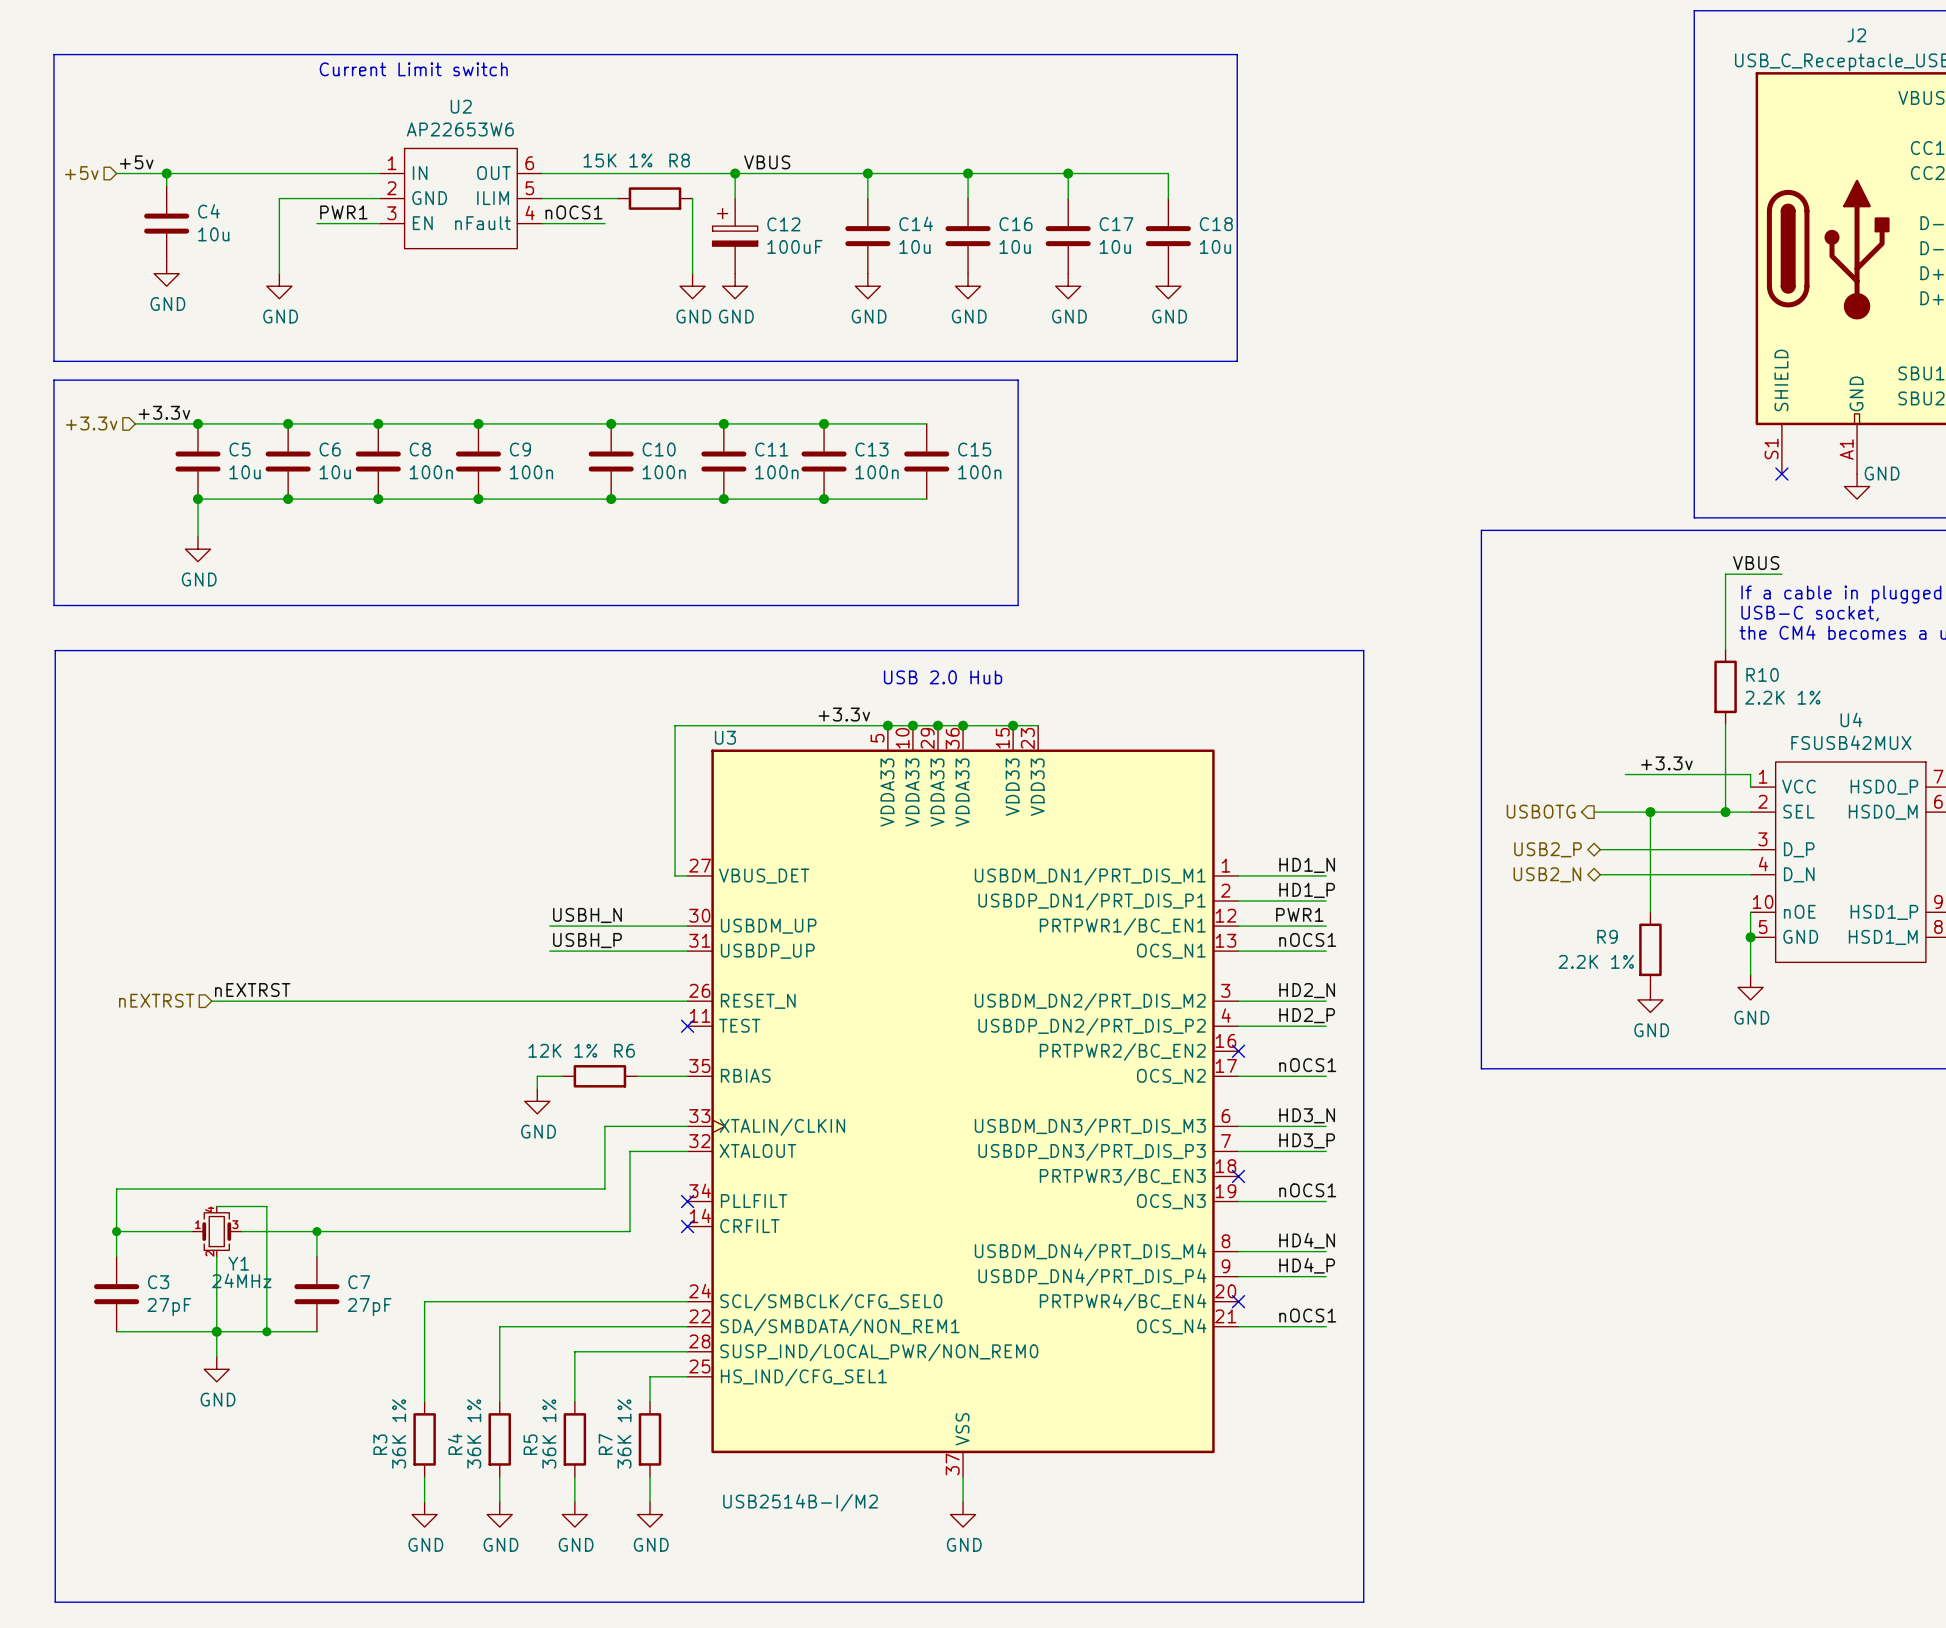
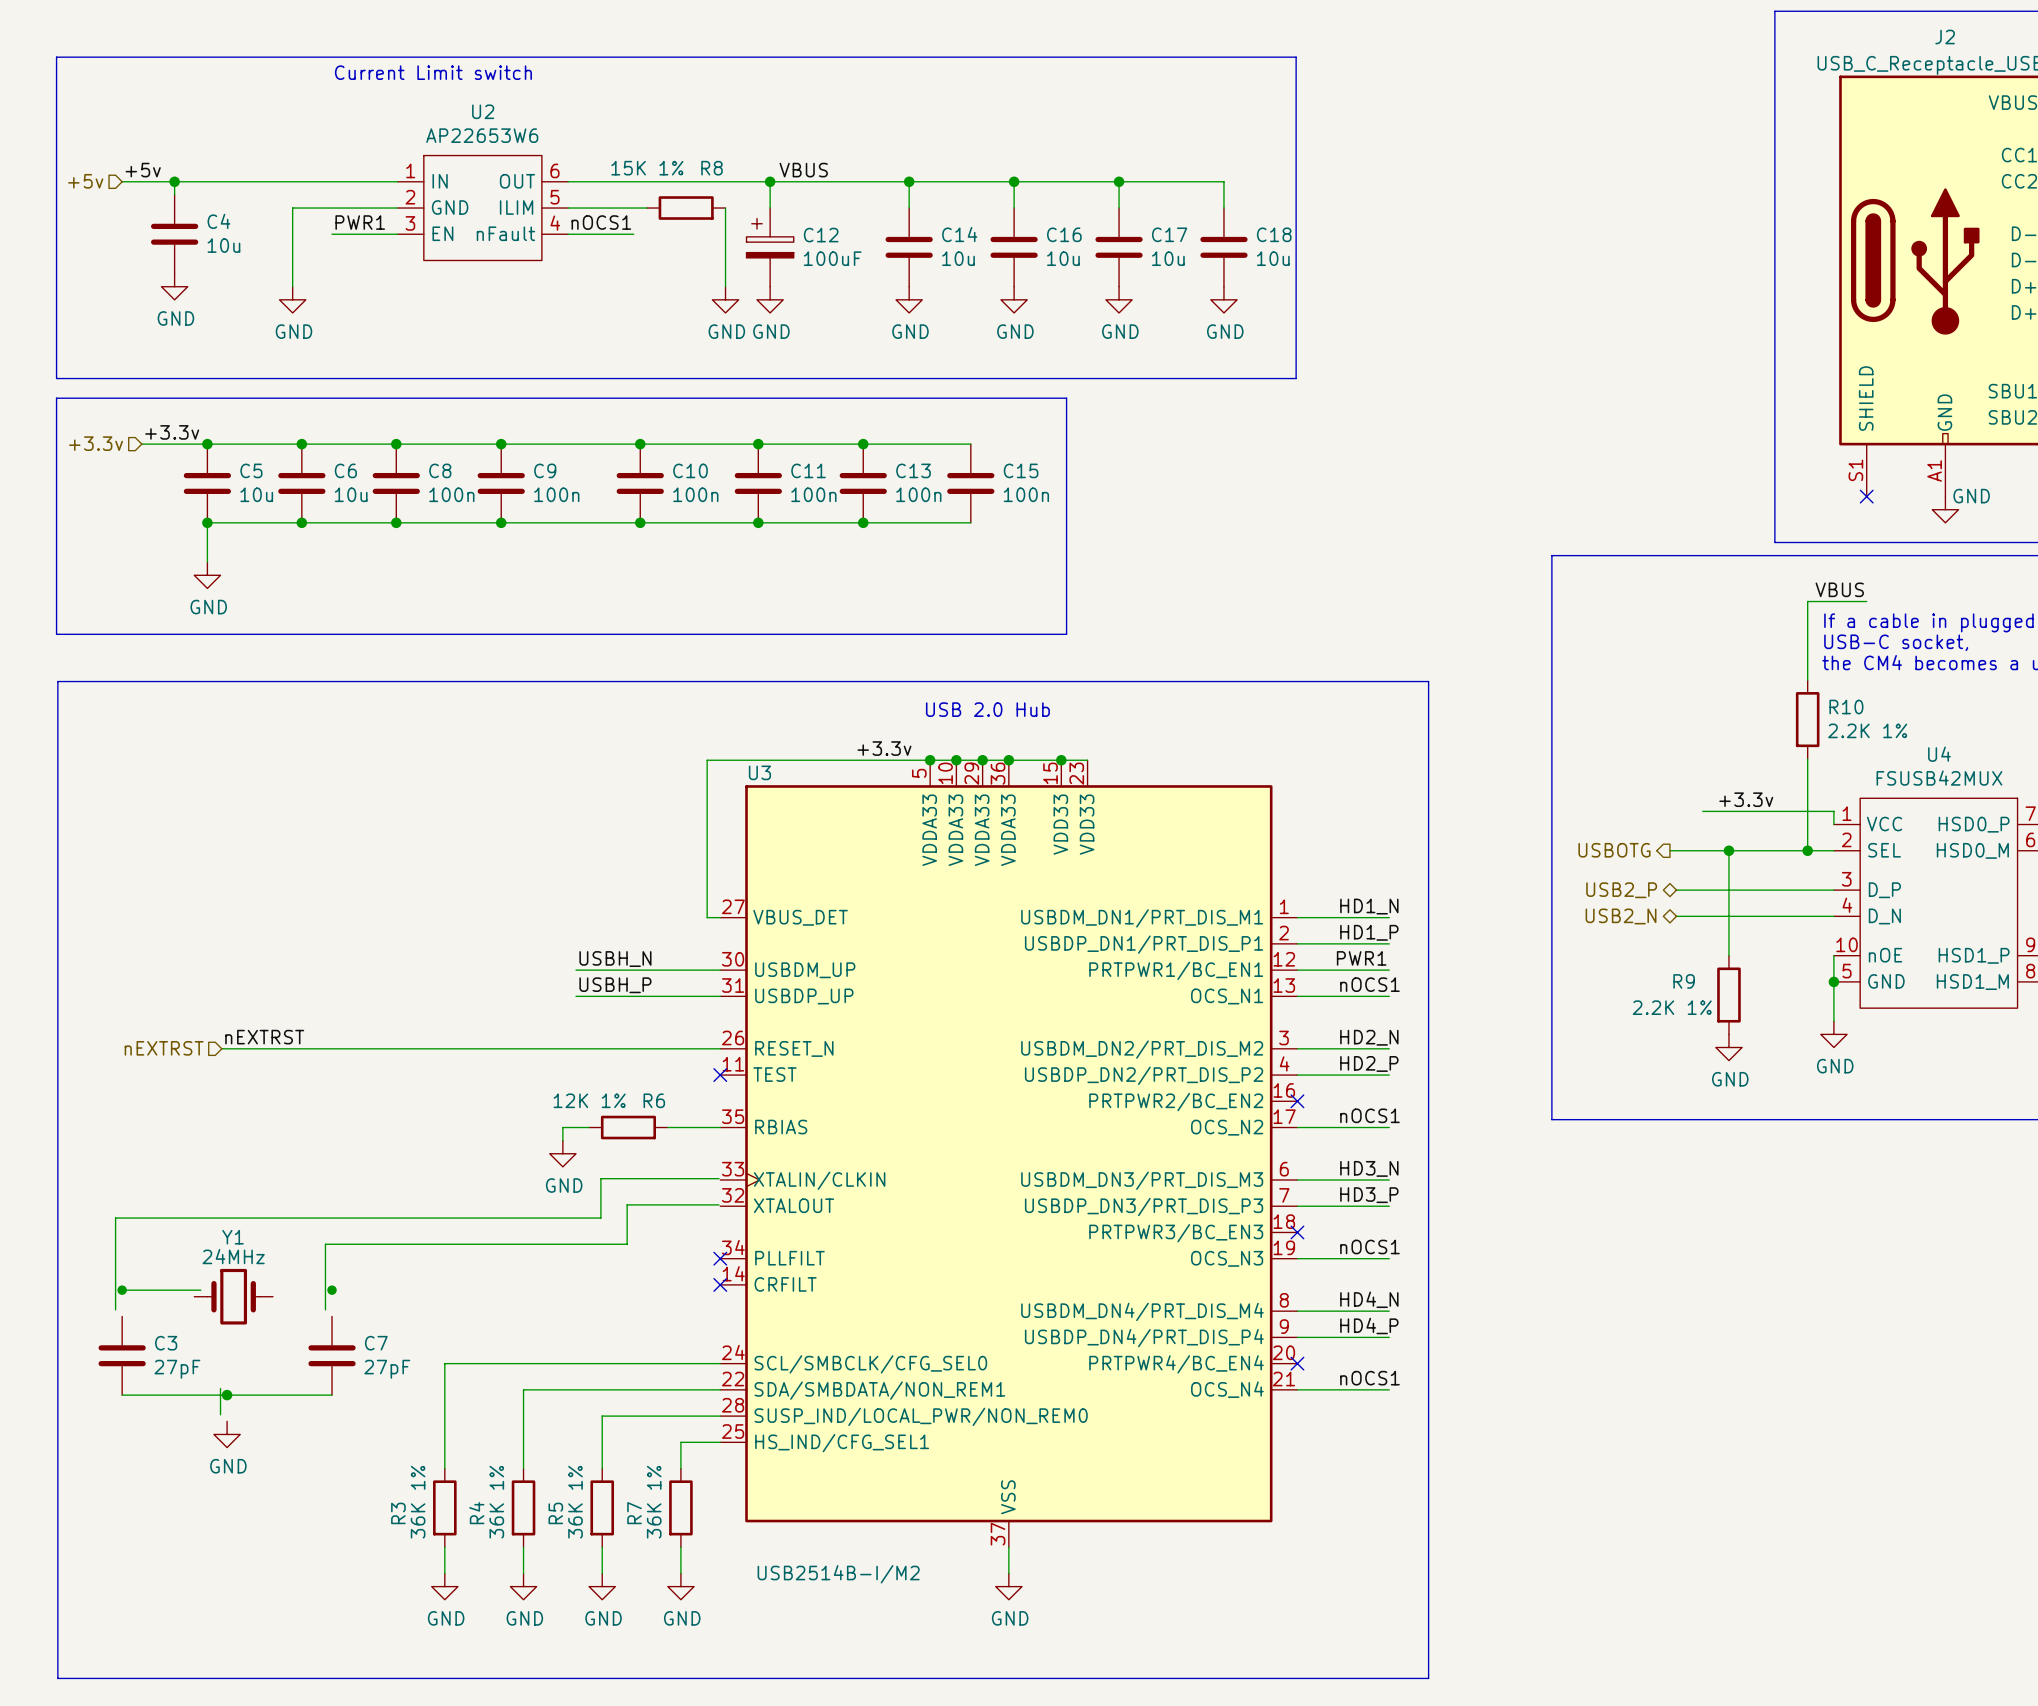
wire: none -> (718, 1178) (600, 1178) (600, 1218) (115, 1218) (115, 1309)
wire: (687, 1126) (604, 1126) (604, 1188) (116, 1188) (116, 1256) -> none
wire: none -> (718, 1204) (627, 1204) (627, 1244) (325, 1244) (325, 1309)
wire: (687, 1151) (629, 1151) (629, 1231) (241, 1231) -> none
Y1 symbol: [191, 1206, 242, 1257] -> [194, 1268, 273, 1325]
wire: (216, 1206) (266, 1206) (266, 1331) -> none
wire: (316, 1231) (316, 1256) -> (220, 1388) (220, 1414)
wire: (216, 1256) (216, 1356) -> none
Y1 name position: Y1 (238, 1263) -> Y1 (233, 1237)
Y1 value position: 24MHz (241, 1280) -> 24MHz (233, 1256)
junction: (266, 1331) -> none

